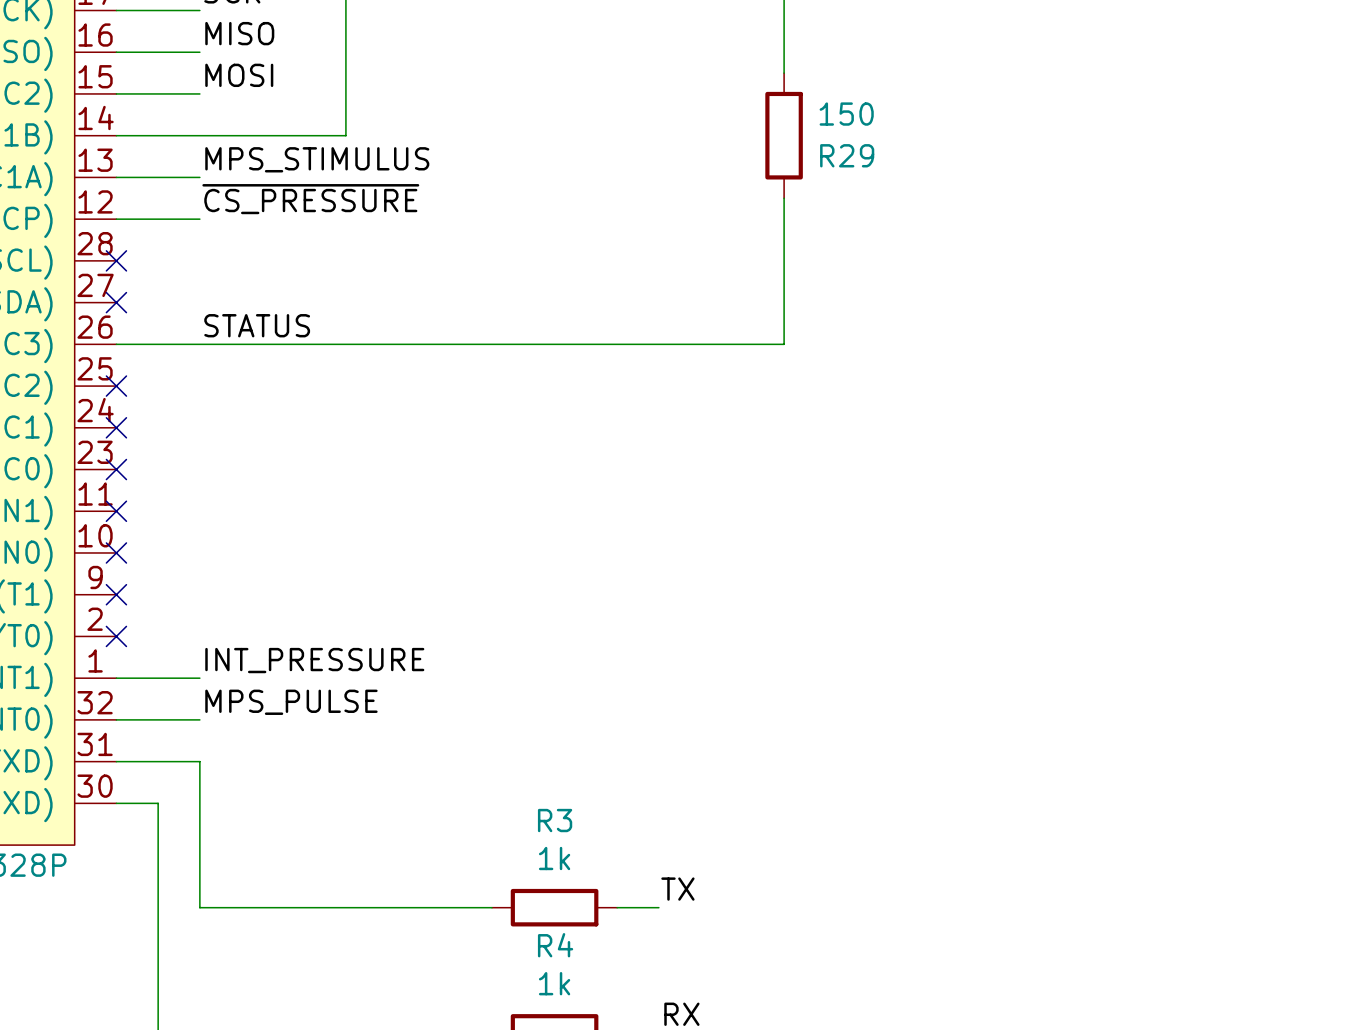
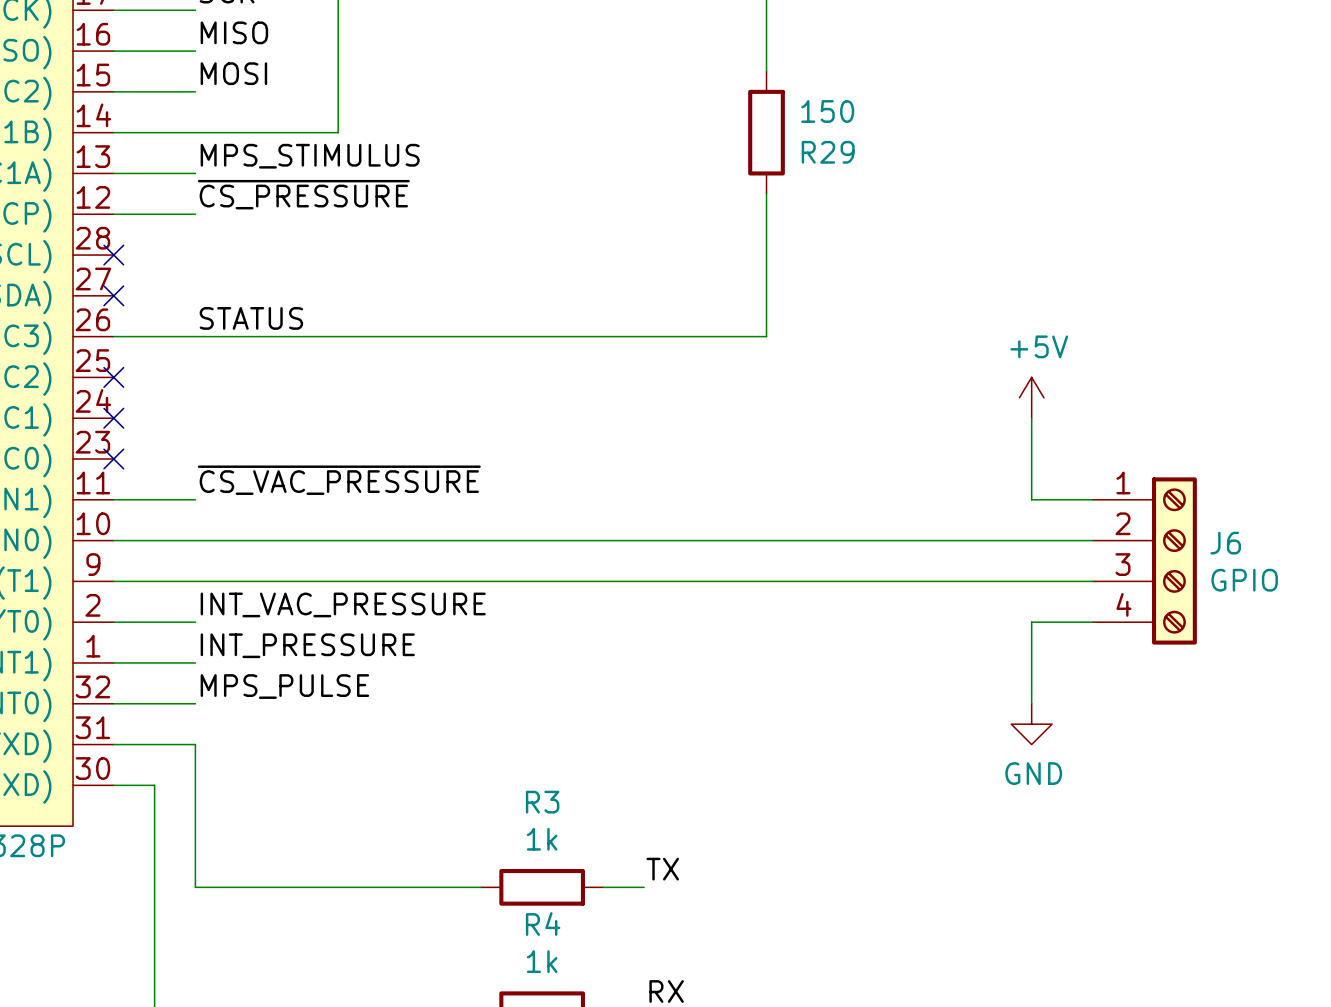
power symbol: none -> +5V (1031, 397)
wire: none -> (1031, 418) (1031, 499) (1092, 499)
label: none -> ~{CS_VAC_PRESSURE} (339, 480)
wire: none -> (113, 499) (195, 499)
no-connect mark: (116, 511) -> none
wire: none -> (113, 540) (1092, 540)
no-connect mark: (116, 552) -> none
J6: none -> GPIO (1144, 560)
wire: none -> (113, 581) (1092, 581)
no-connect mark: (116, 594) -> none
label: none -> INT_VAC_PRESSURE (343, 604)
wire: none -> (113, 622) (195, 622)
no-connect mark: (116, 636) -> none
wire: none -> (1092, 622) (1031, 622) (1031, 703)
power symbol: none -> GND (1031, 724)

